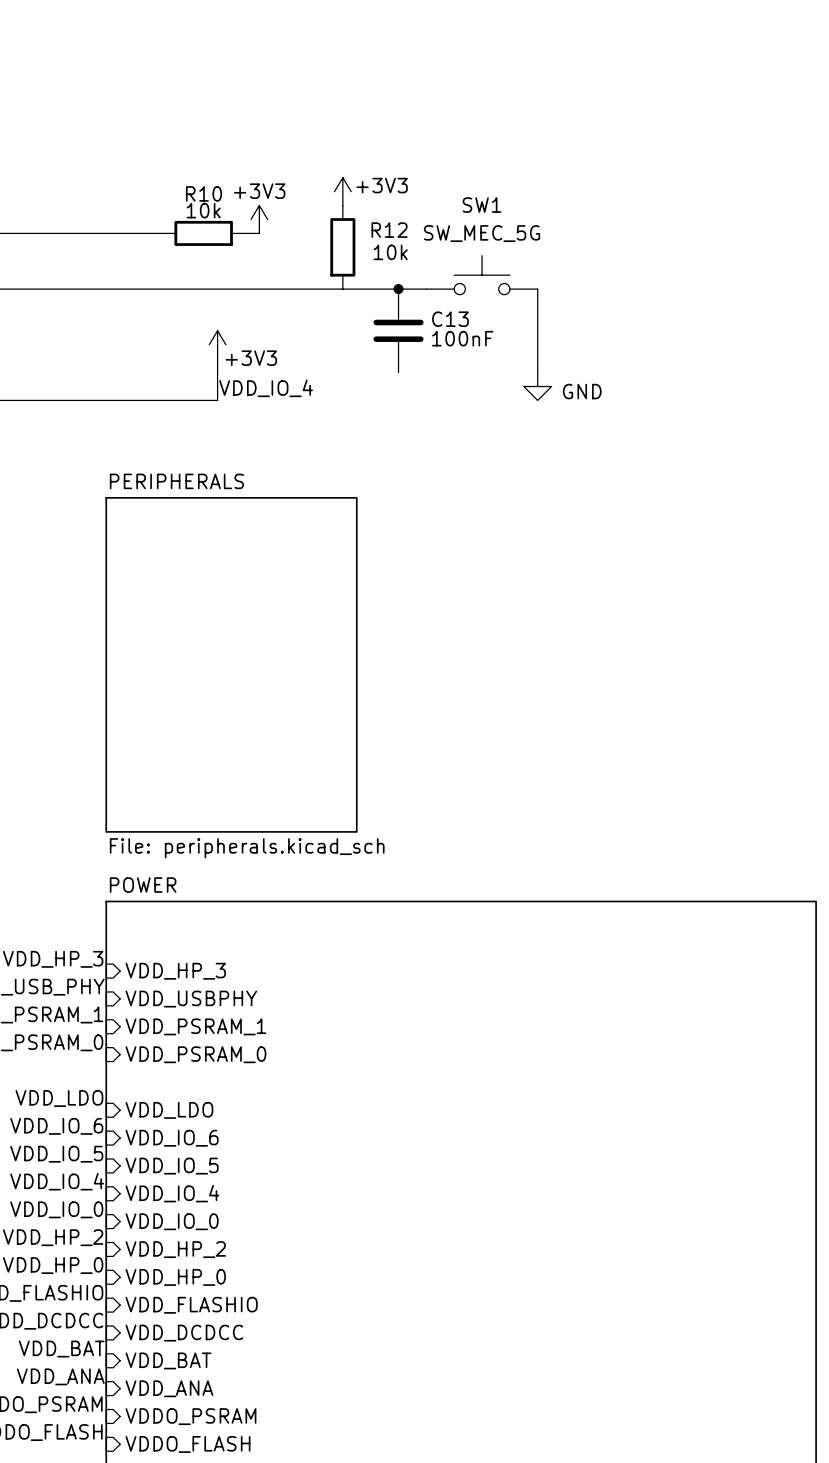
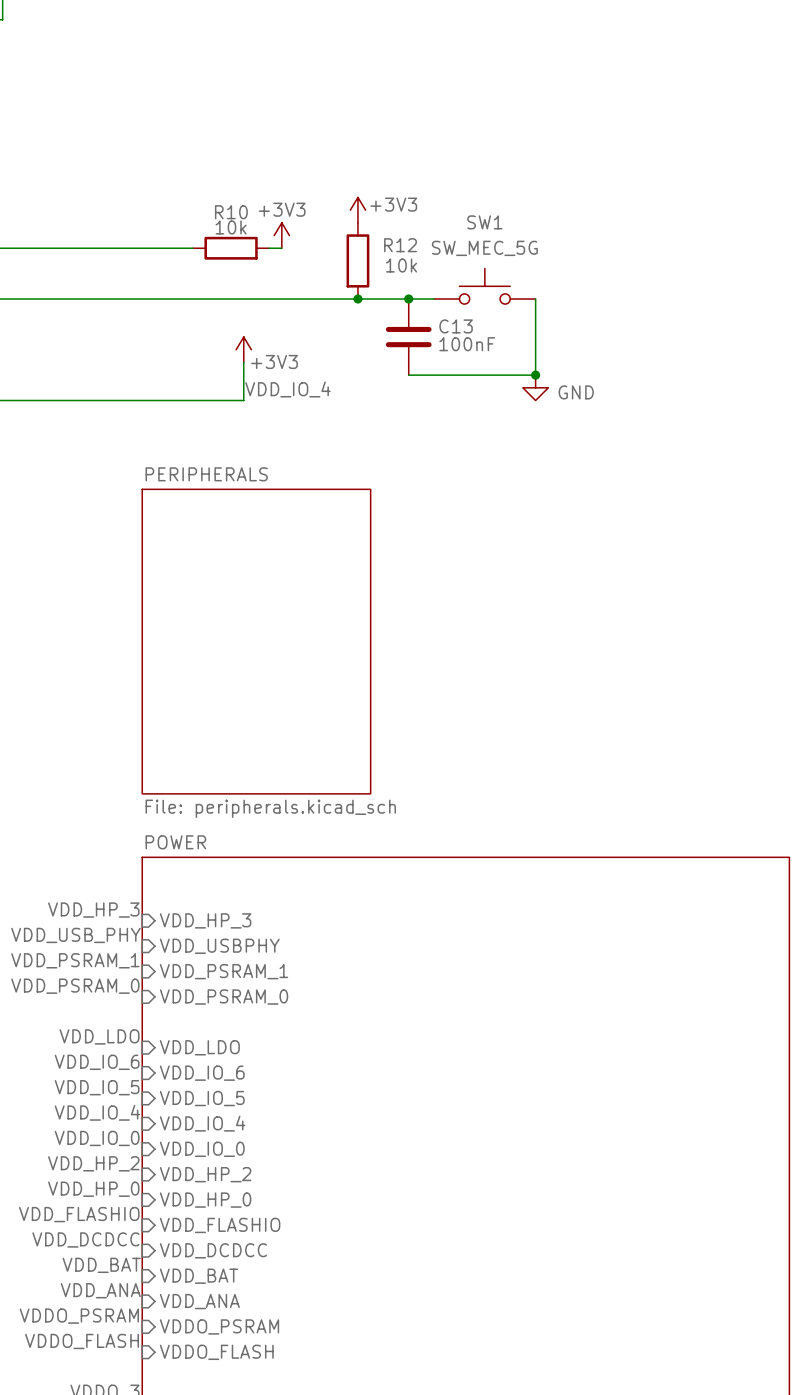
junction: none -> (357, 298)
wire: none -> (408, 375) (535, 375)
junction: none -> (535, 375)

